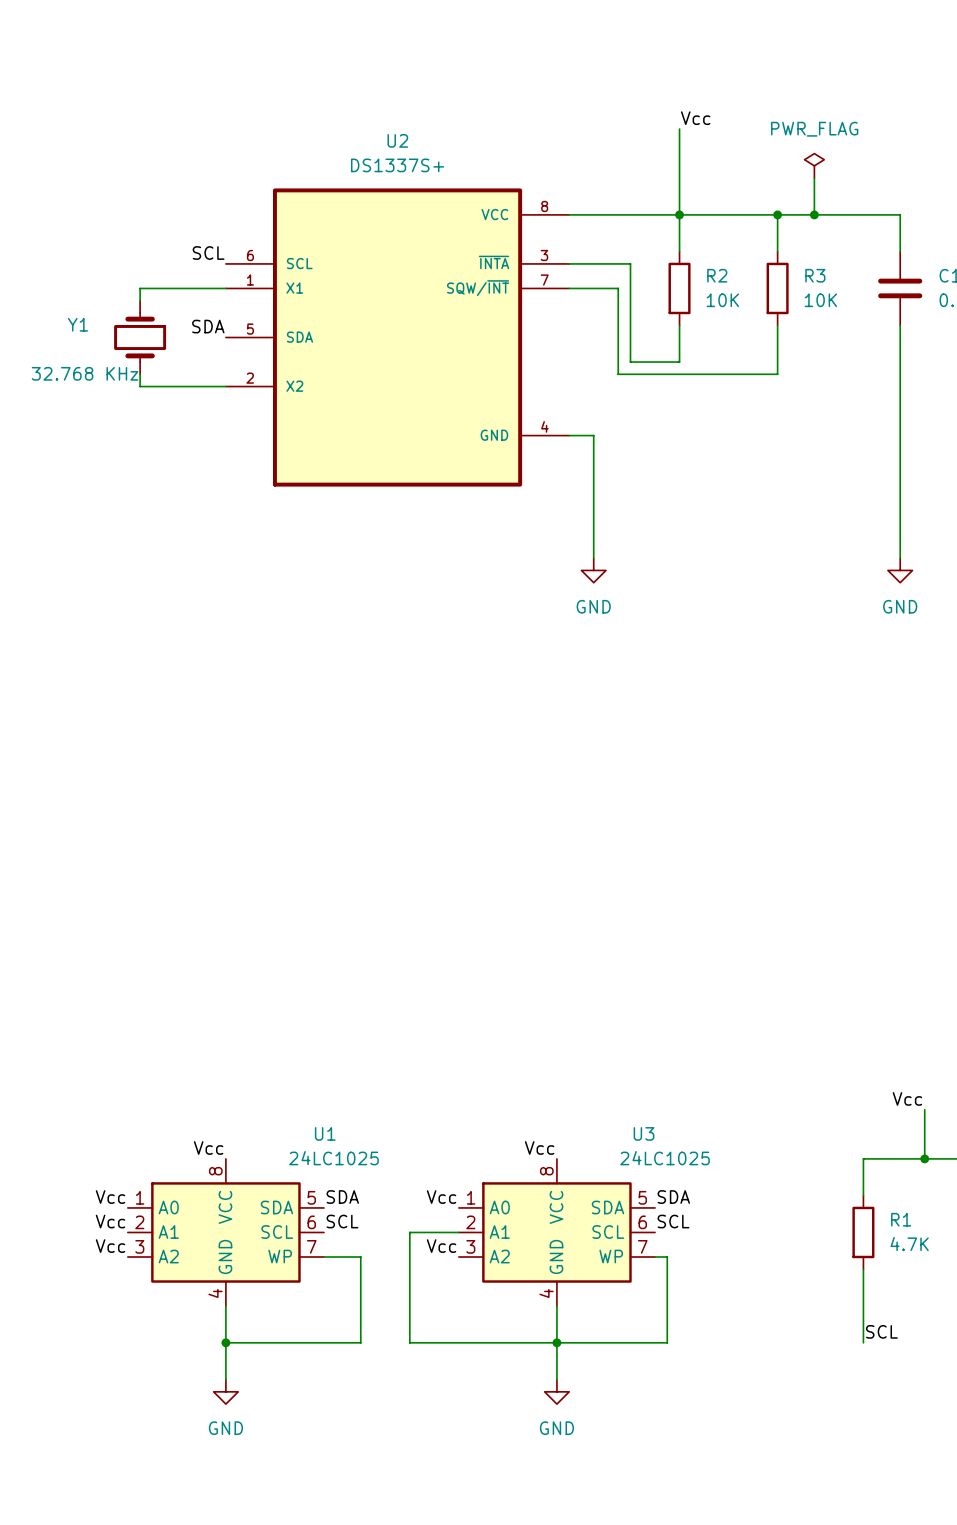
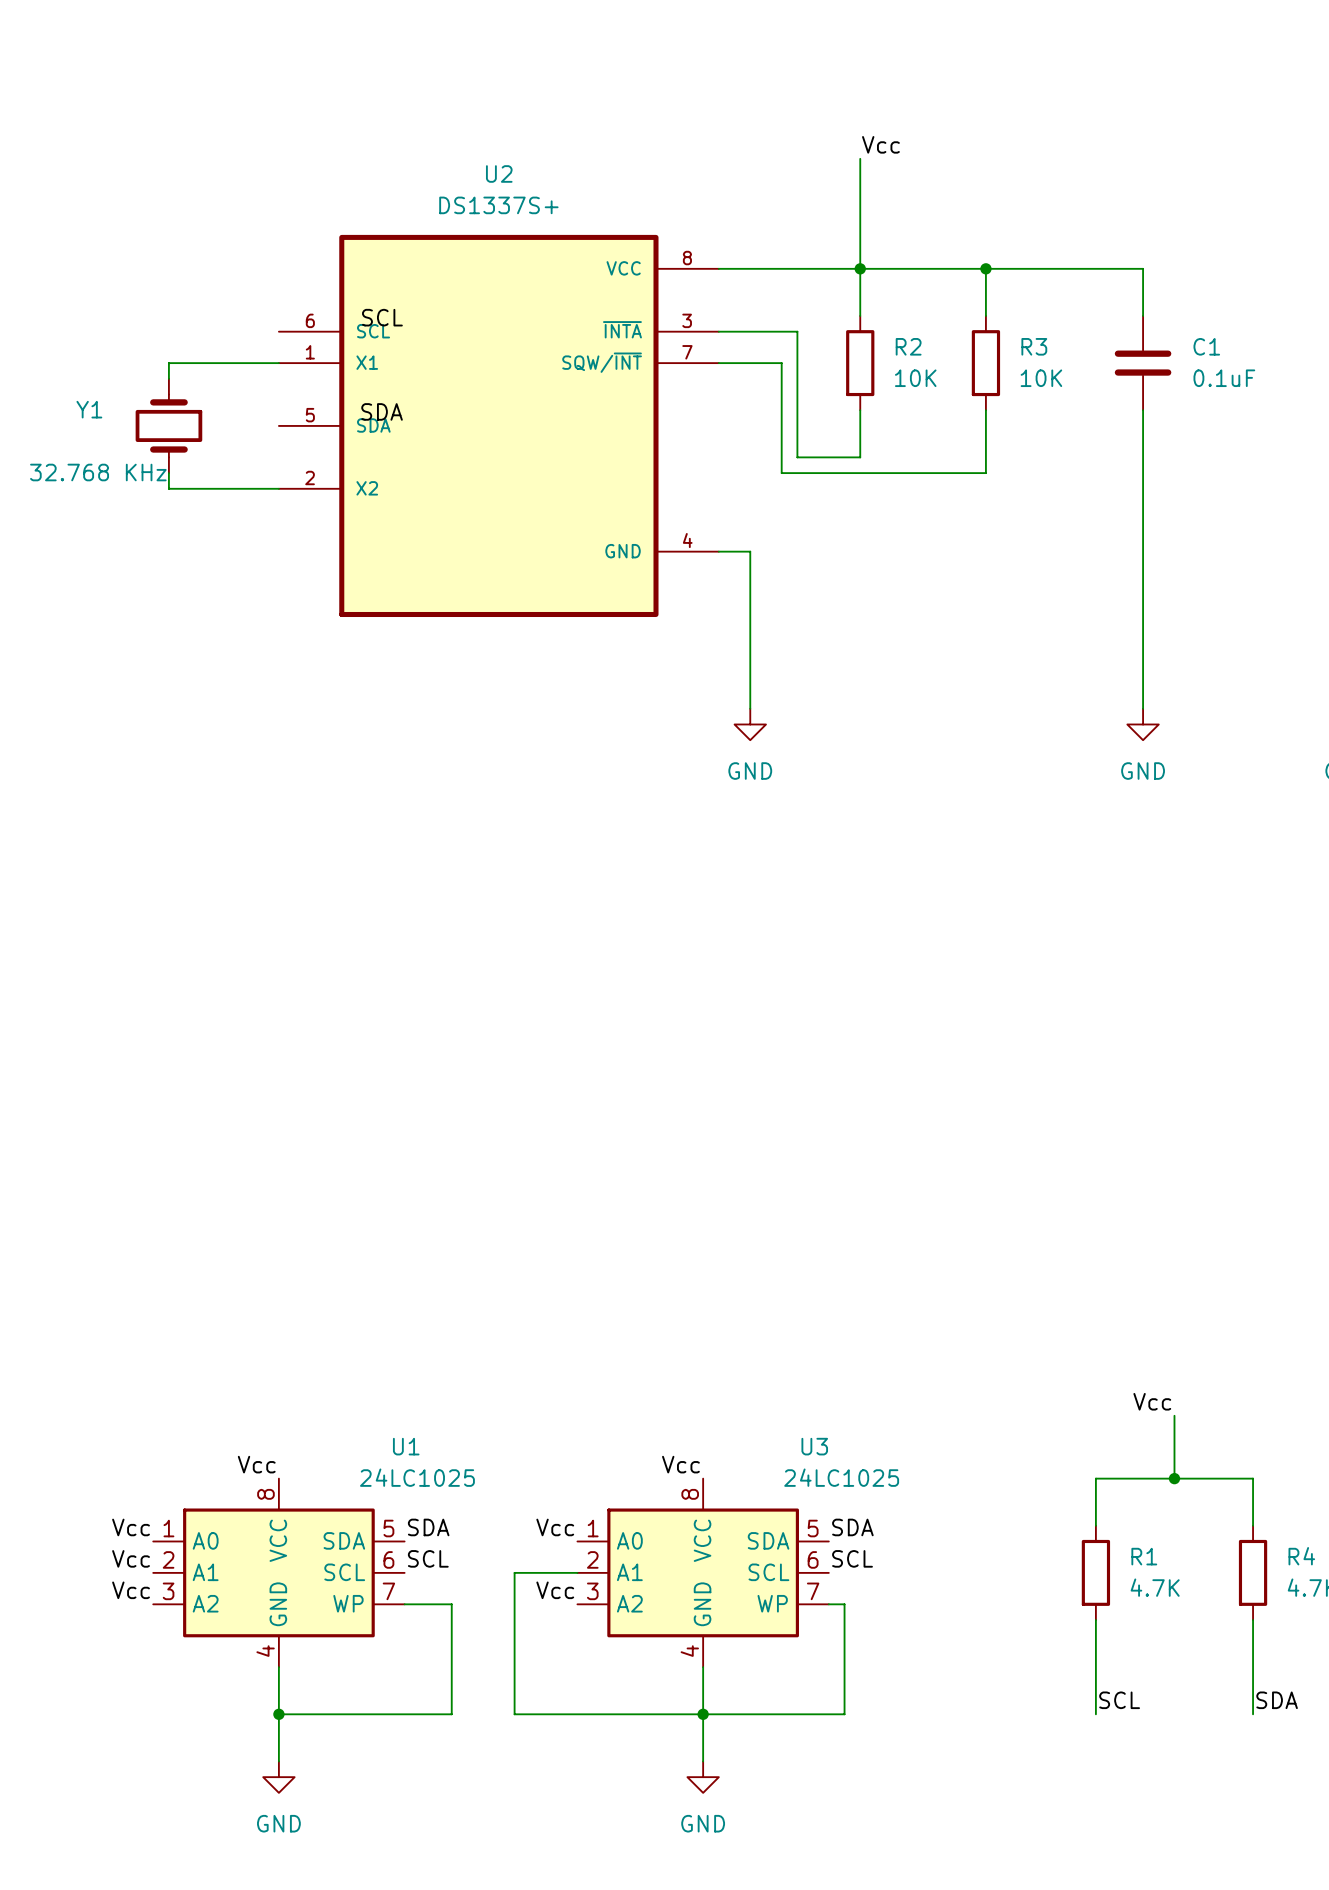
power symbol: PWR_FLAG (814, 165) -> none
wire: (814, 178) (814, 214) -> none
junction: (814, 214) -> none
label position: SCL (208, 253) -> SCL (382, 317)
label position: SDA (208, 326) -> SDA (382, 411)

